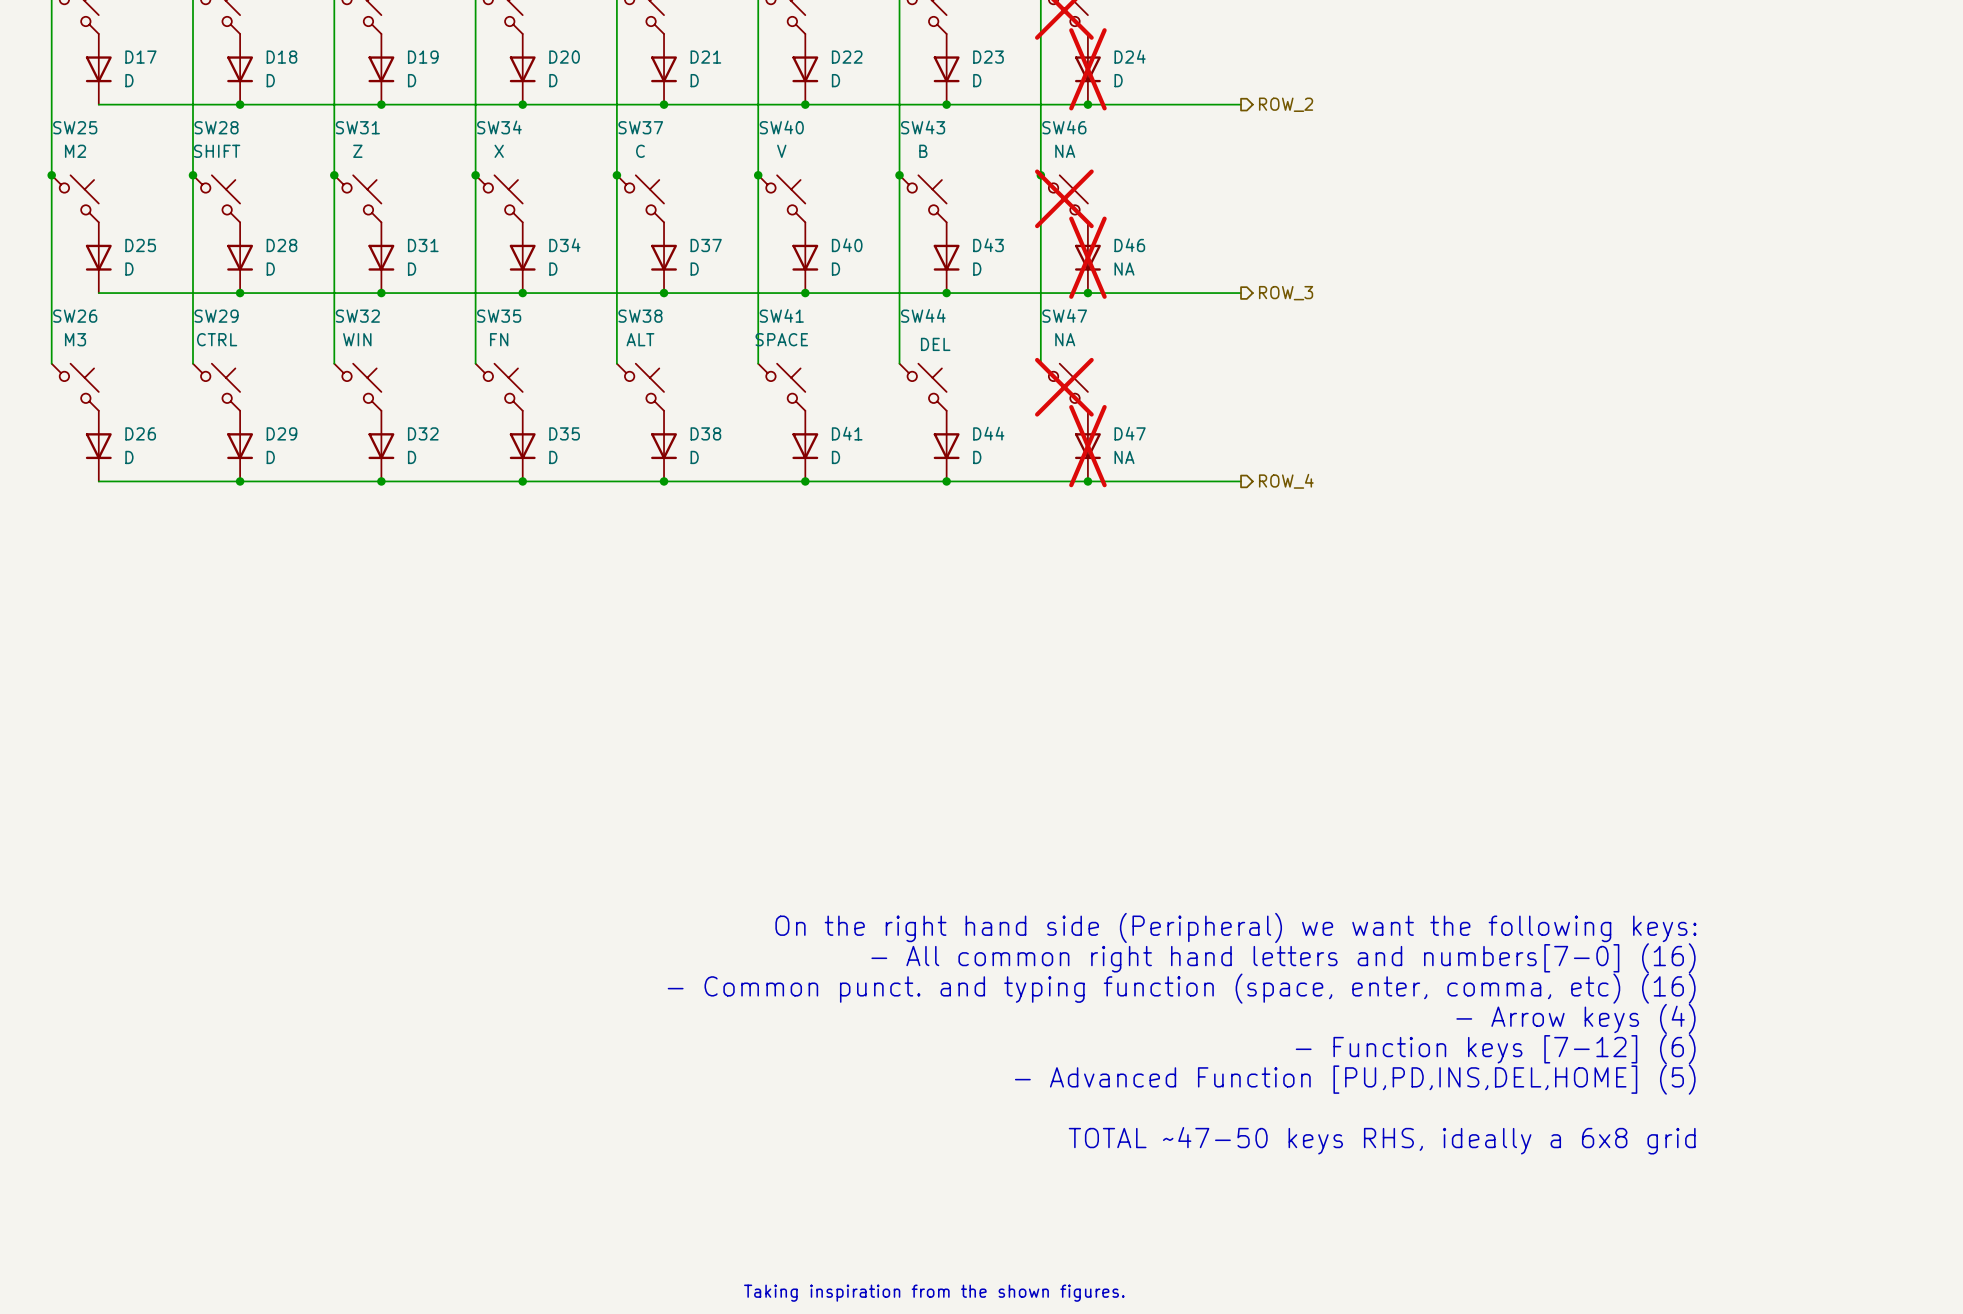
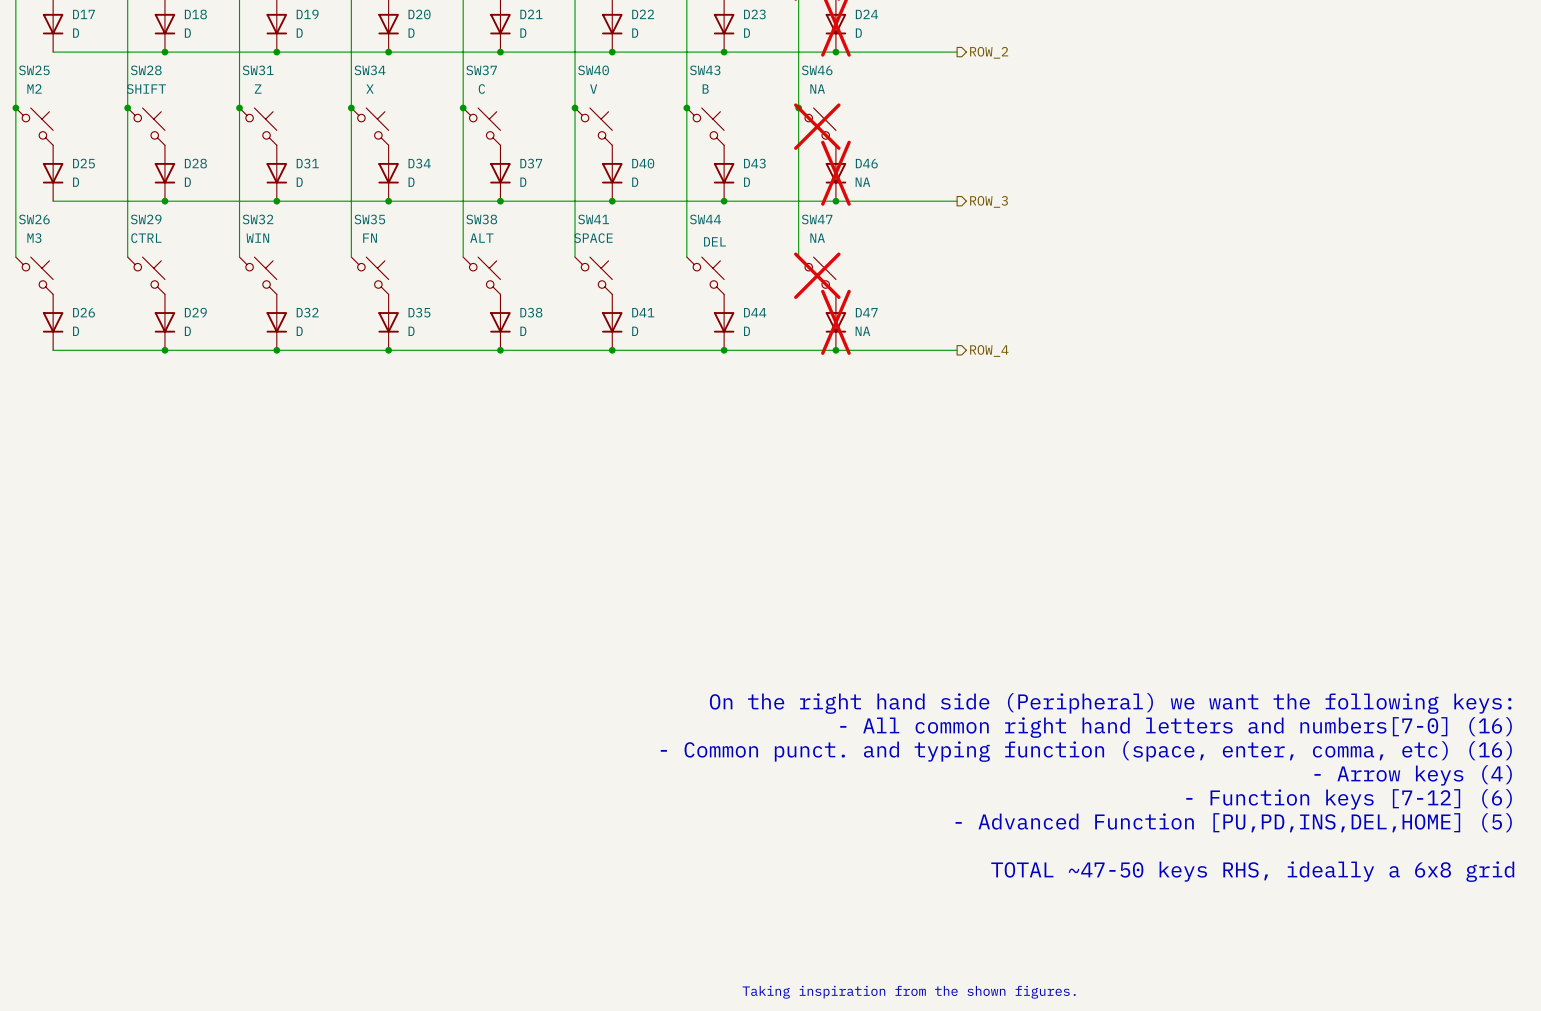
text: On the right hand side (Peripheral) we want the following keys: (1235, 927) -> none
text: none -> On the right hand side (Peripheral) we want the following keys: (1110, 703)
text: - All common right hand letters and numbers[7-0] (16) (1283, 958) -> none
text: none -> - All common right hand letters and numbers[7-0] (16) (1176, 727)
text: - Common punct. and typing function (space, enter, comma, etc) (16) (1181, 988) -> none
text: none -> - Common punct. and typing function (space, enter, comma, etc) (16) (1086, 751)
text: - Arrow keys (4) (1575, 1018) -> none
text: none -> - Arrow keys (4) (1413, 775)
text: - Function keys [7-12] (6) (1495, 1049) -> none
text: none -> - Function keys [7-12] (6) (1349, 799)
text: - Advanced Function [PU,PD,INS,DEL,HOME] (5) (1355, 1079) -> none
text: none -> - Advanced Function [PU,PD,INS,DEL,HOME] (5) (1233, 822)
text: TOTAL ~47-50 keys RHS, ideally a 6x8 grid (1382, 1140) -> none
text: none -> TOTAL ~47-50 keys RHS, ideally a 6x8 grid (1252, 871)
text: Taking inspiration from the shown figures. (934, 1293) -> none
text: none -> Taking inspiration from the shown figures. (909, 992)

